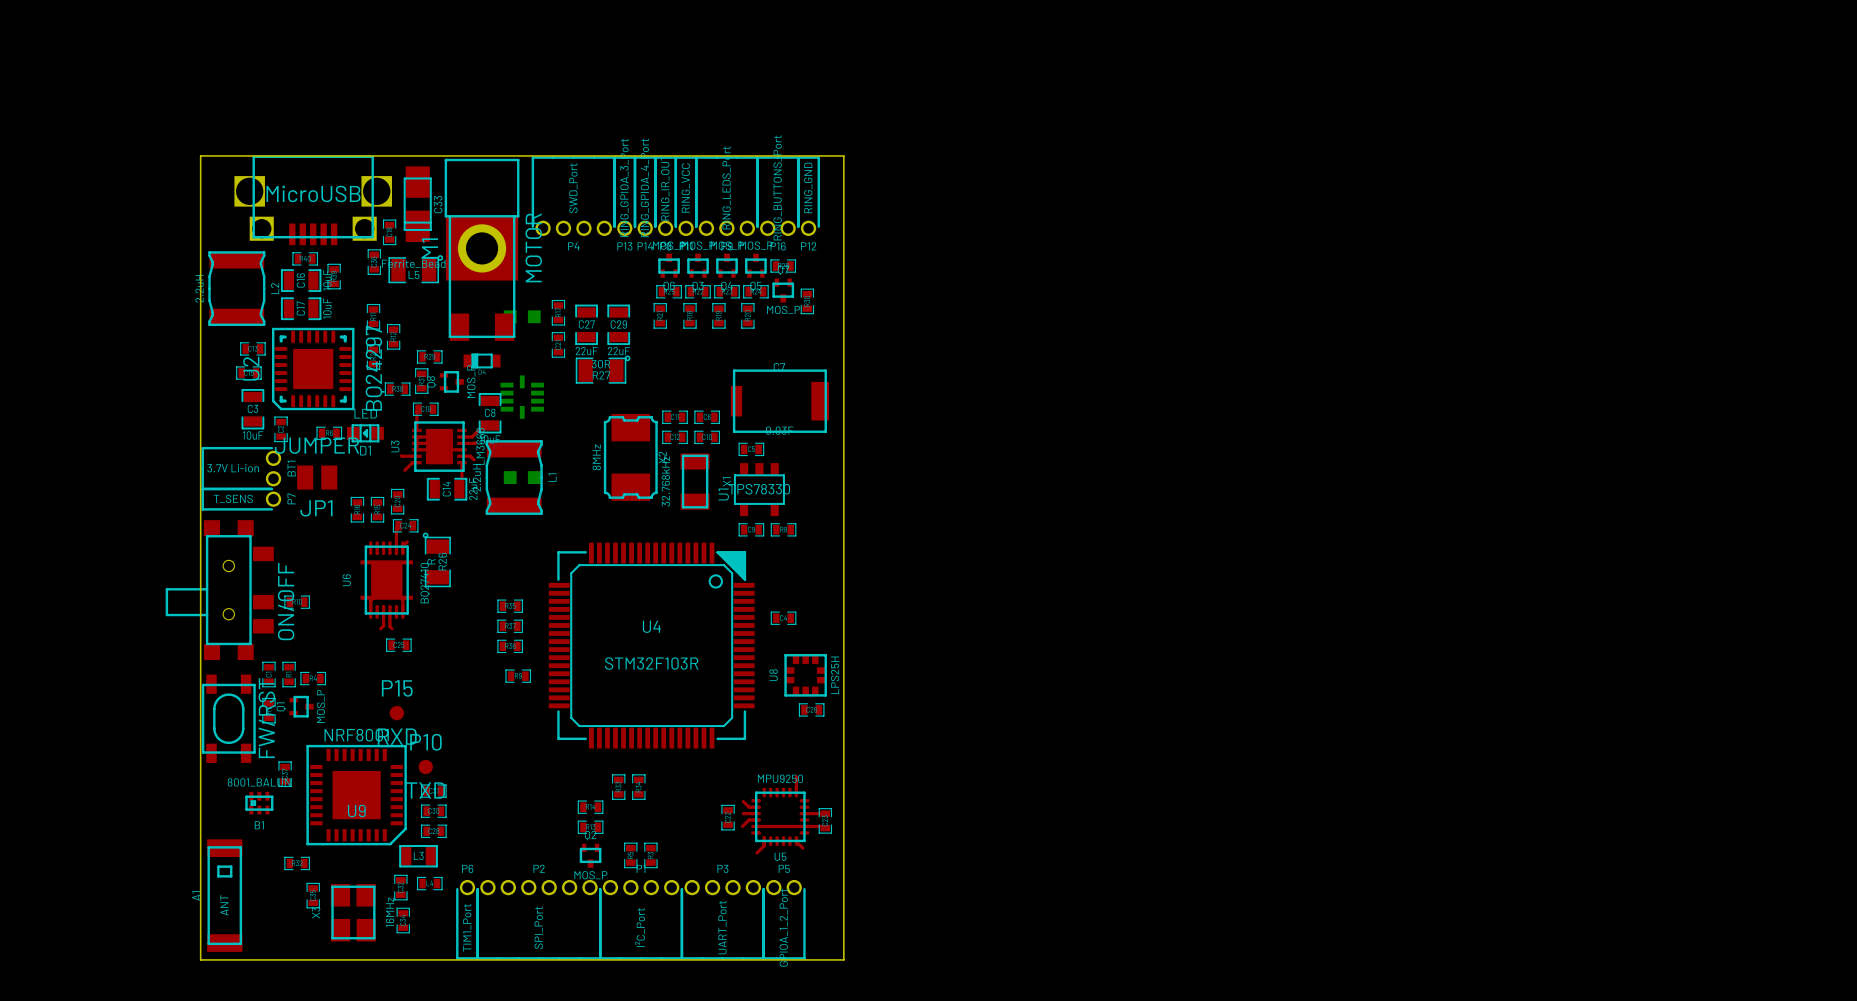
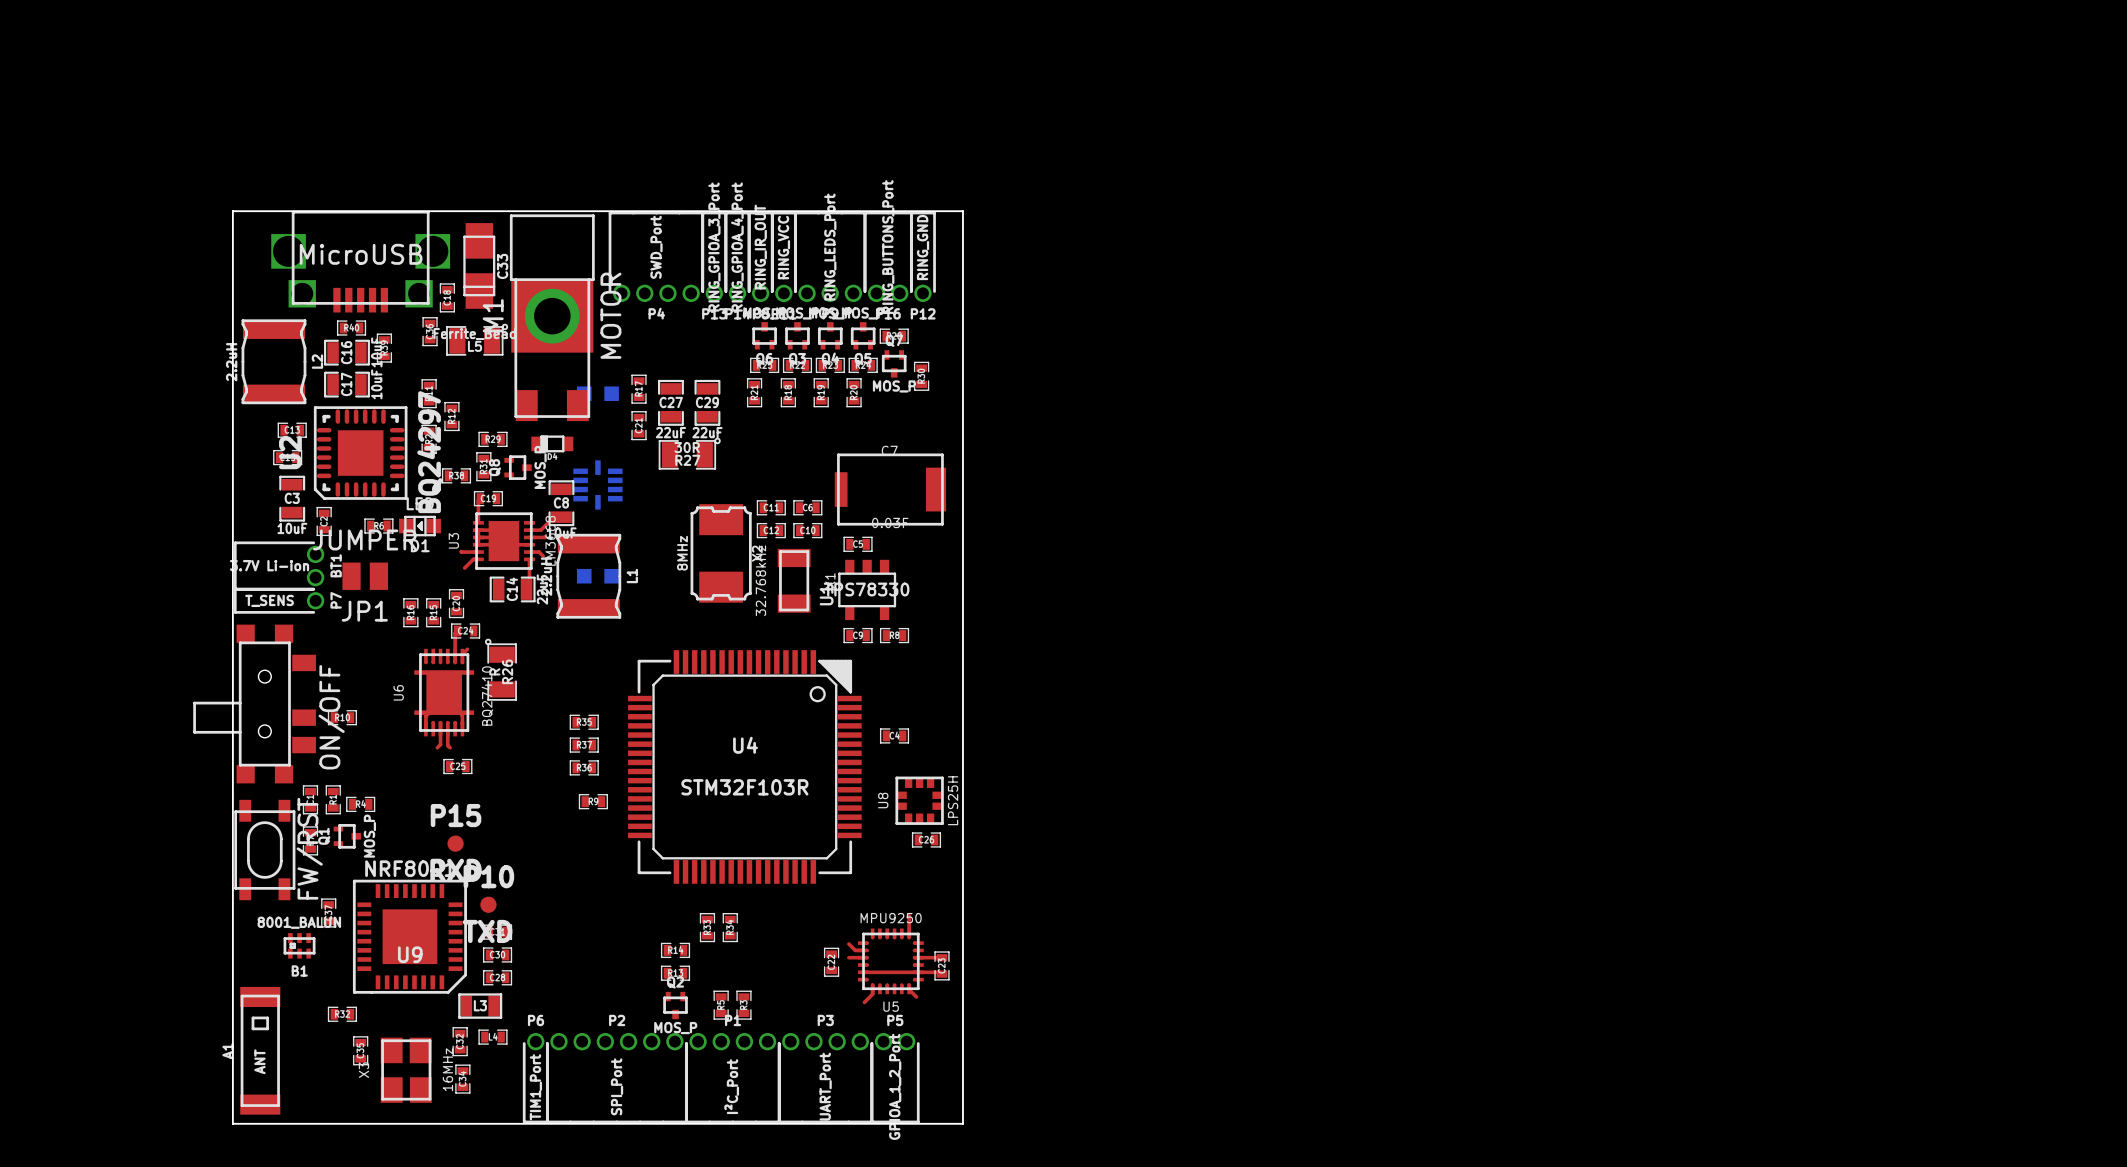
top track: (755, 820) (748, 820) (742, 826) -> none

